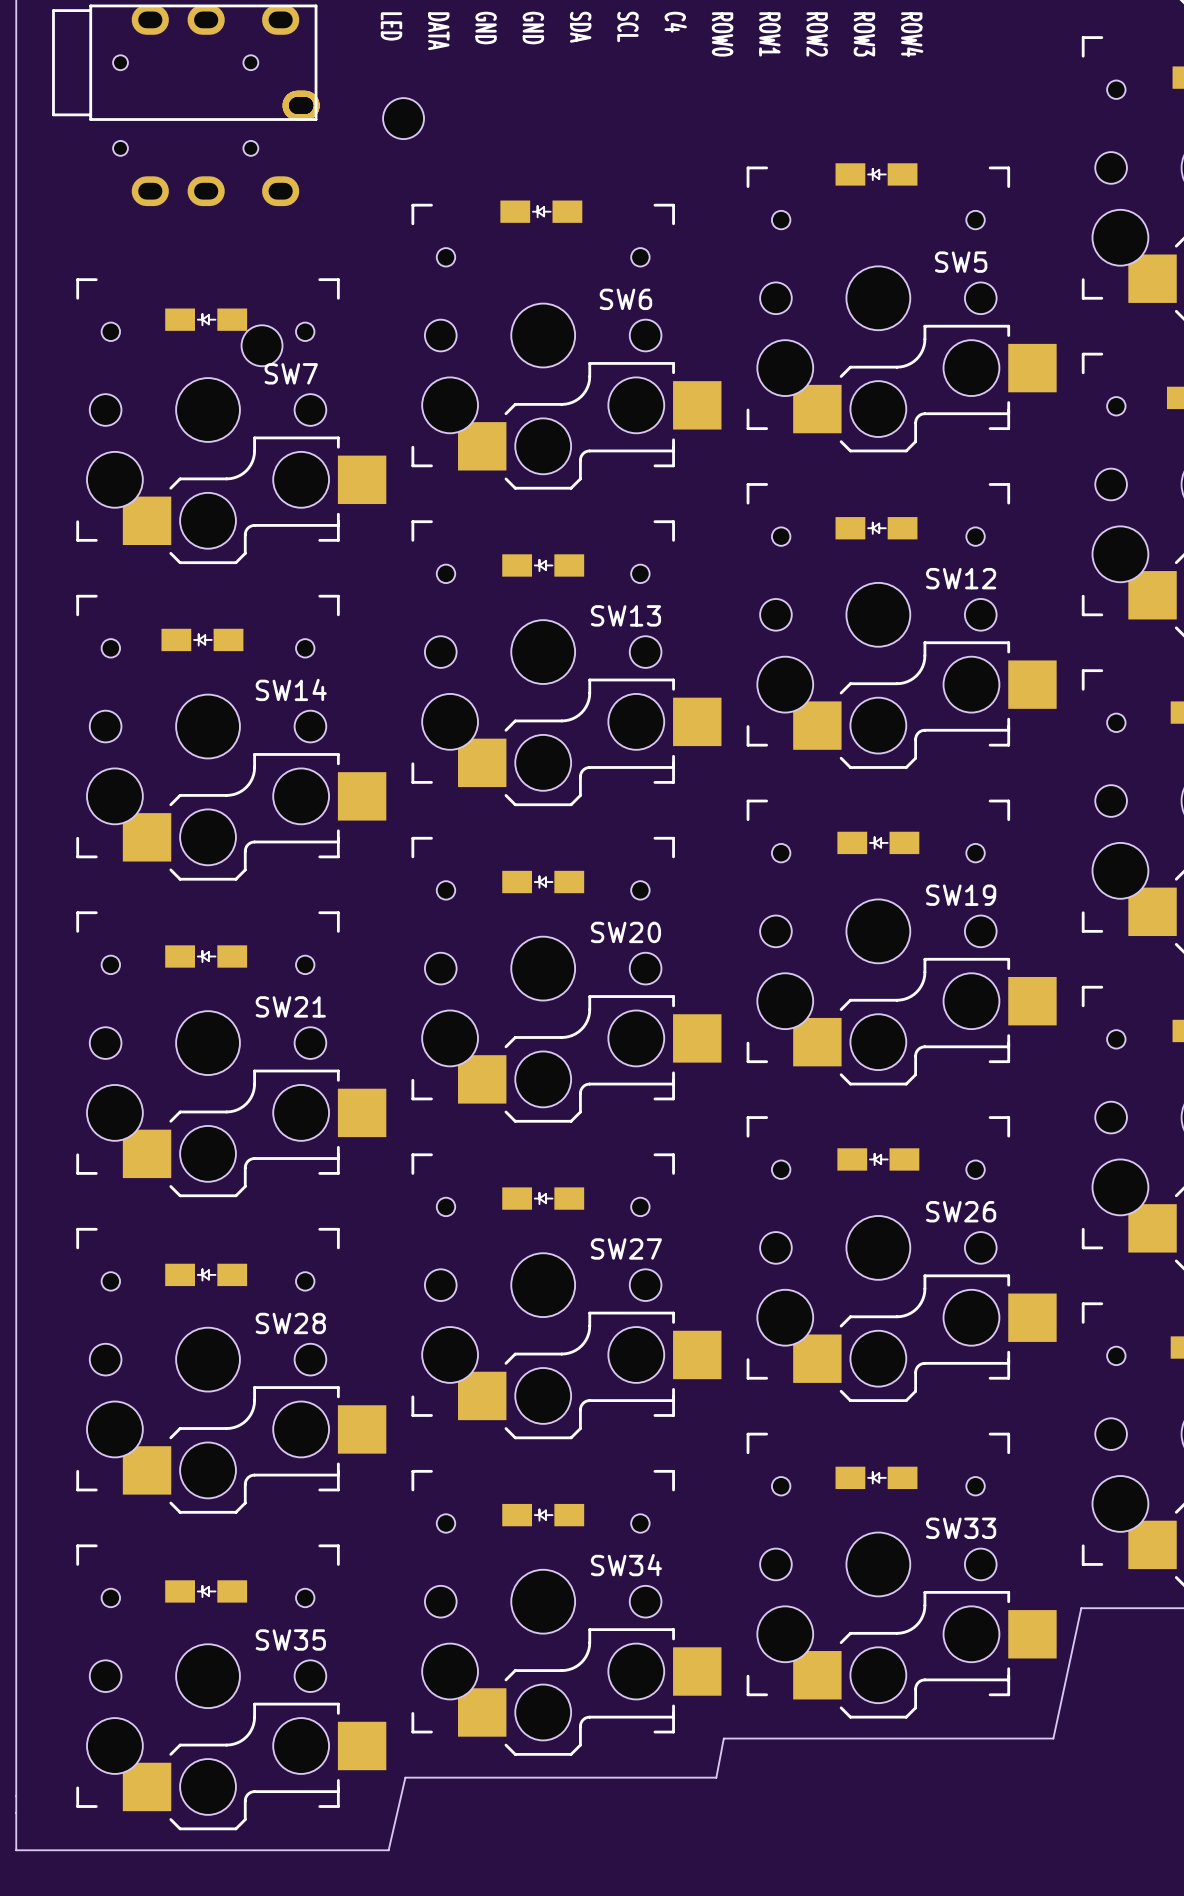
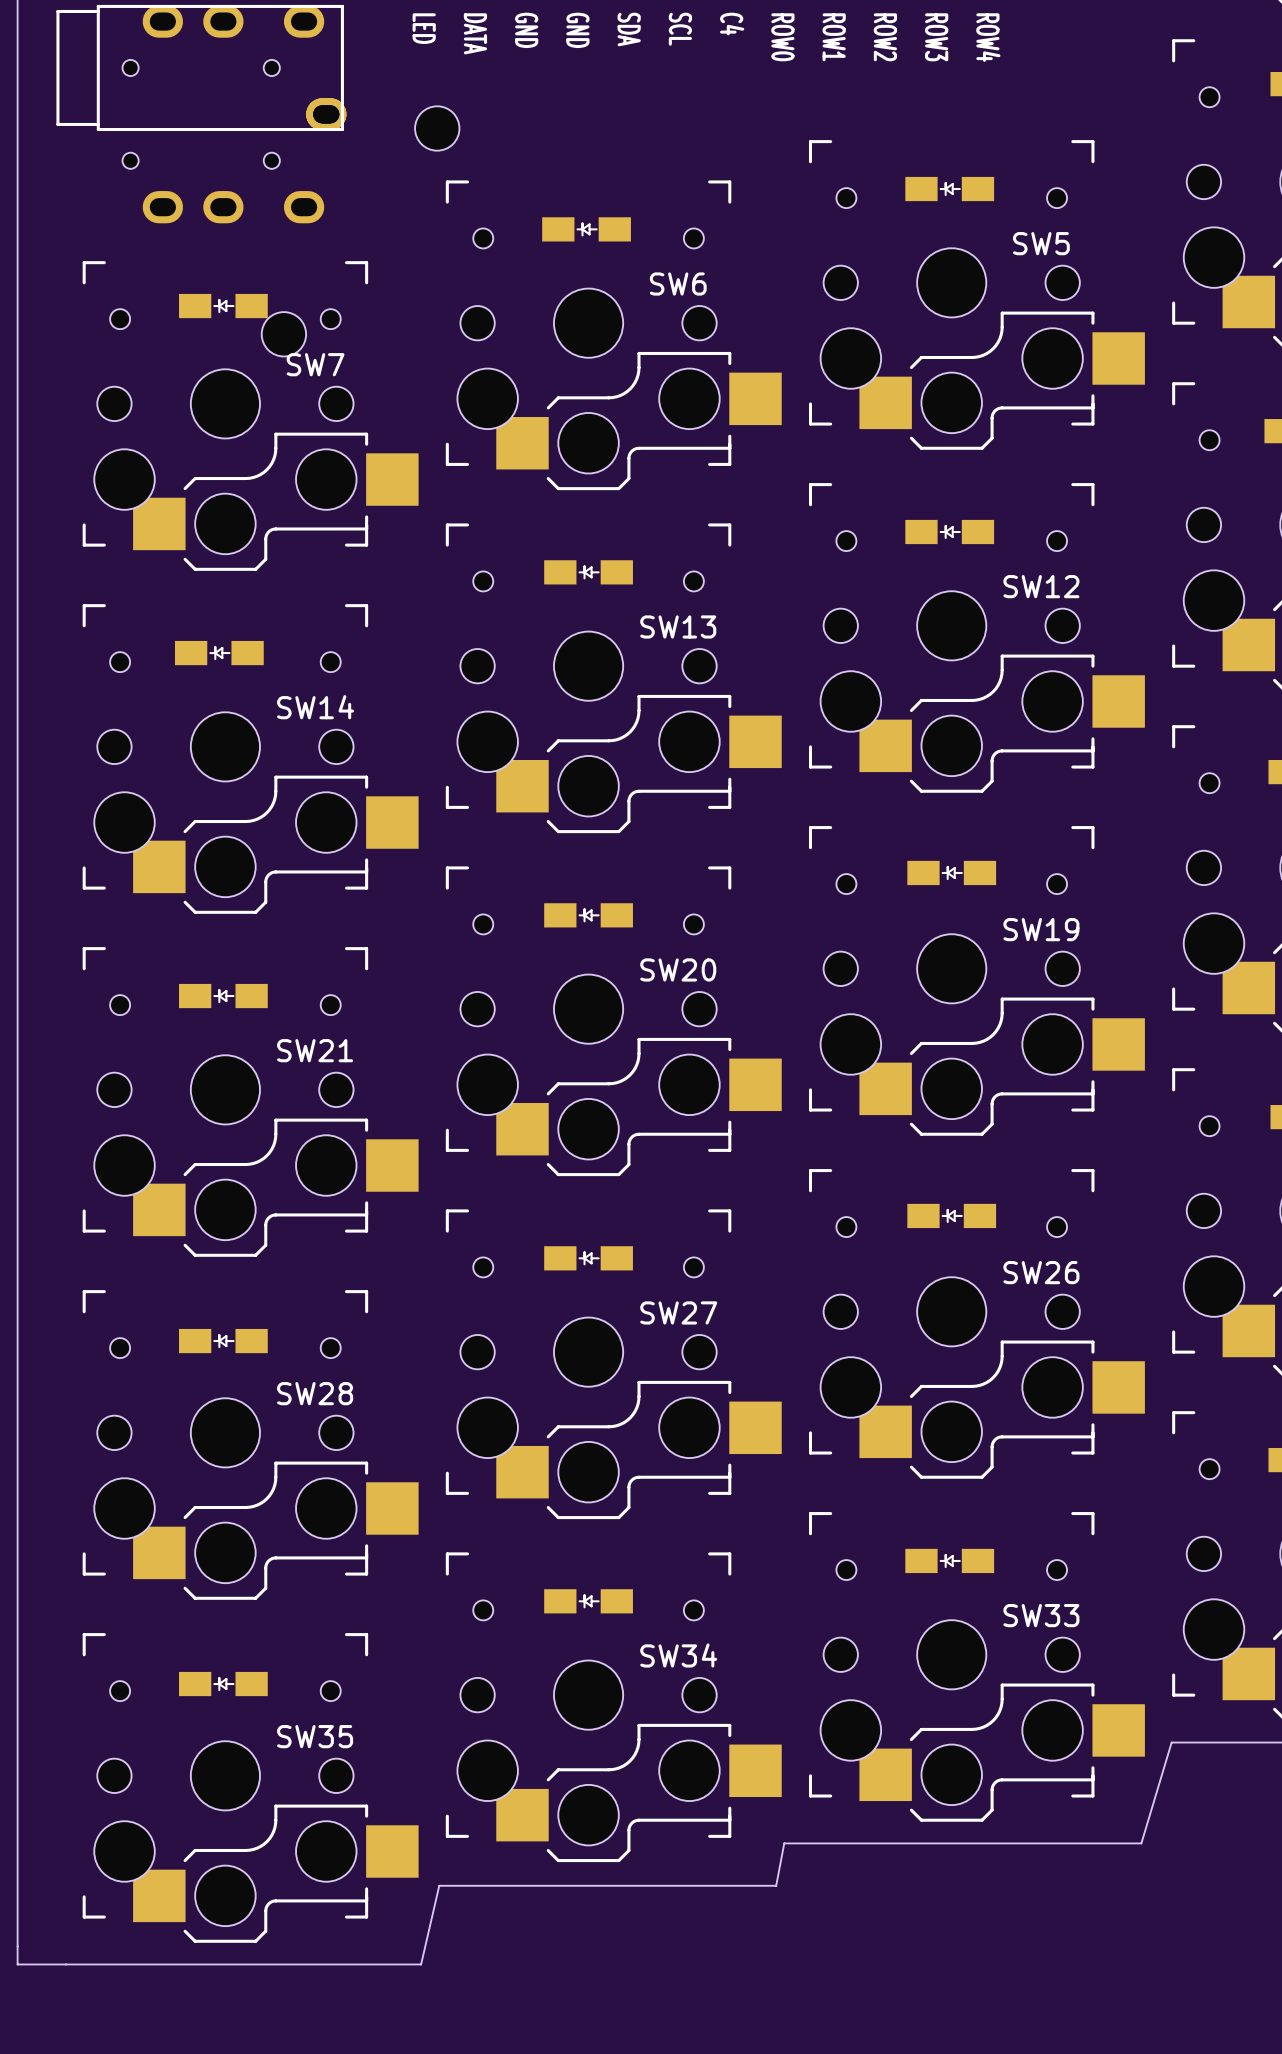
SW5 position: (901, 309) -> (976, 294)
part position: (206, 319) -> (223, 306)
part position: (262, 345) -> (283, 334)
SW6 position: (566, 346) -> (613, 335)
SW7 position: (231, 421) -> (250, 415)
part position: (876, 528) -> (949, 532)
part position: (543, 565) -> (588, 572)
SW12 position: (901, 625) -> (976, 637)
part position: (202, 639) -> (219, 653)
SW13 position: (566, 663) -> (613, 678)
SW14 position: (231, 737) -> (250, 758)
part position: (878, 842) -> (951, 872)
part position: (543, 882) -> (588, 915)
SW19 position: (901, 942) -> (976, 980)
part position: (206, 956) -> (223, 996)
SW20 position: (566, 979) -> (613, 1021)
SW21 position: (231, 1054) -> (250, 1101)
part position: (878, 1159) -> (951, 1215)
part position: (543, 1198) -> (588, 1258)
SW26 position: (901, 1259) -> (976, 1323)
part position: (206, 1274) -> (223, 1341)
SW27 position: (566, 1296) -> (613, 1364)
SW28 position: (231, 1370) -> (250, 1444)
part position: (876, 1477) -> (949, 1560)
part position: (543, 1515) -> (588, 1601)
SW33 position: (901, 1575) -> (976, 1666)
part position: (206, 1591) -> (223, 1684)
board edge: (1081, 1608) (1053, 1738) (723, 1738) (716, 1777) (405, 1777) (388, 1850) (16, 1850) (16, 1813) -> (1171, 1742) (1141, 1843) (784, 1843) (776, 1885) (439, 1885) (421, 1964) (17, 1964)
SW34 position: (566, 1612) -> (613, 1707)
SW35 position: (231, 1687) -> (250, 1787)

